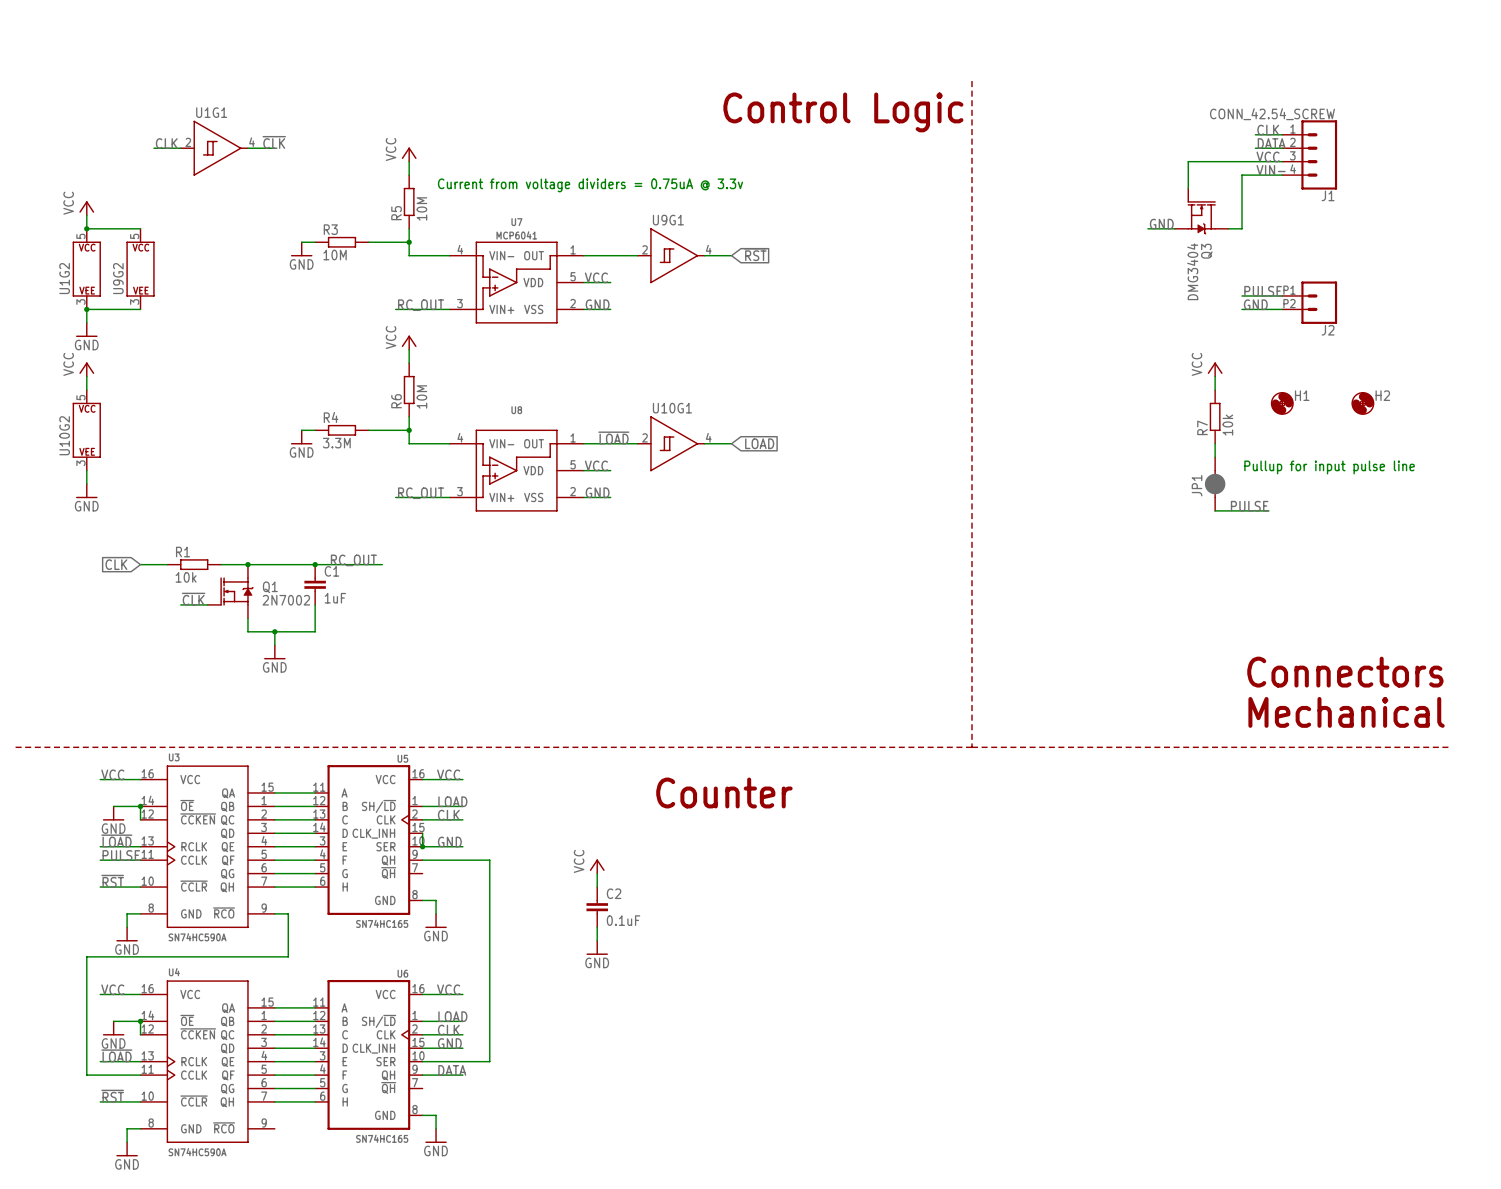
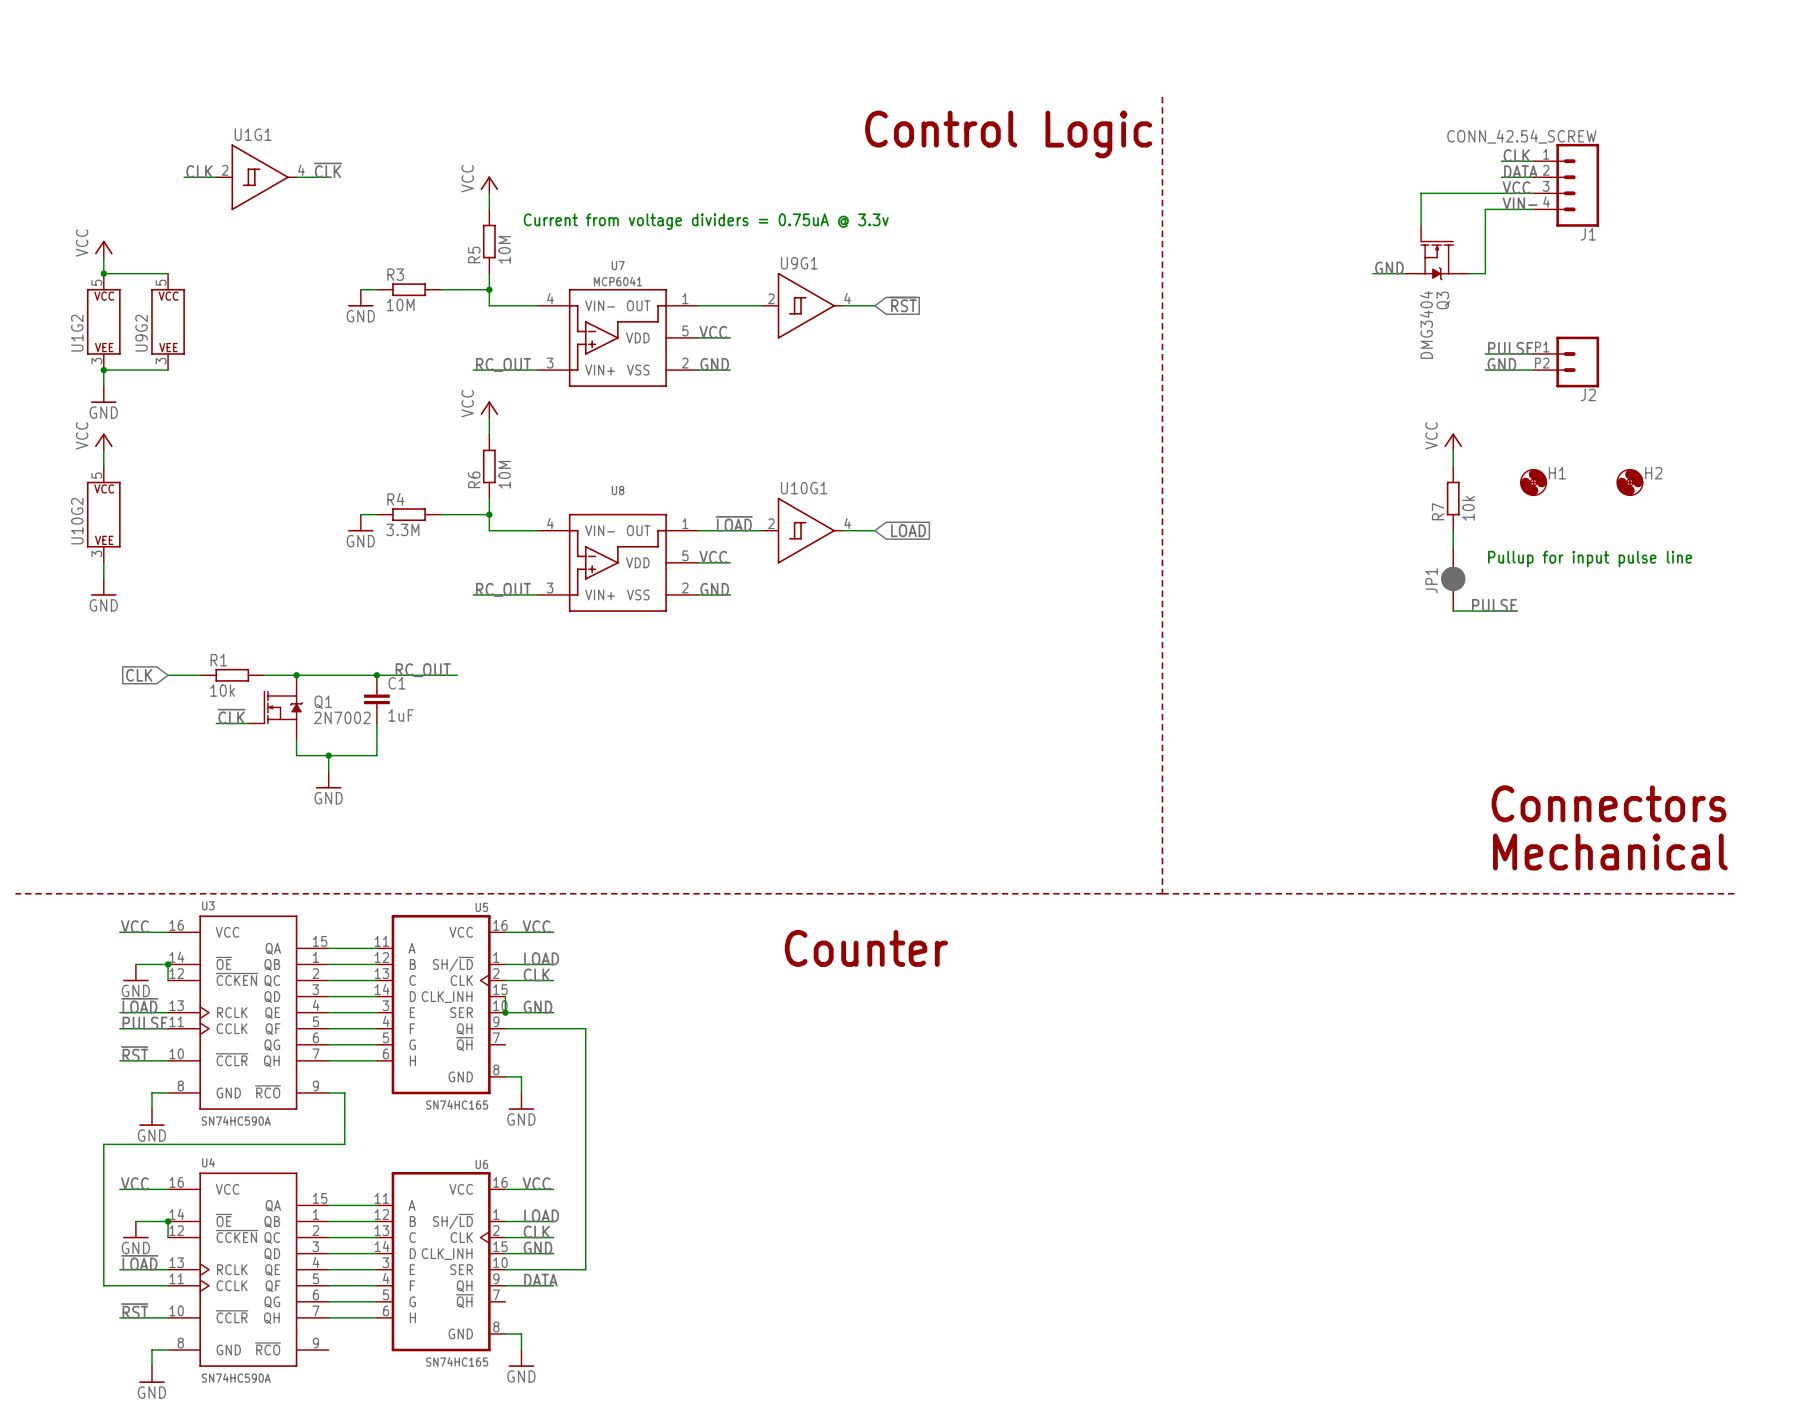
power symbol: VCC (597, 866) -> none
wire: (597, 873) (597, 887) -> none
C2: 0.1uF (597, 907) -> none
wire: (597, 927) (597, 940) -> none
power symbol: GND (597, 947) -> none

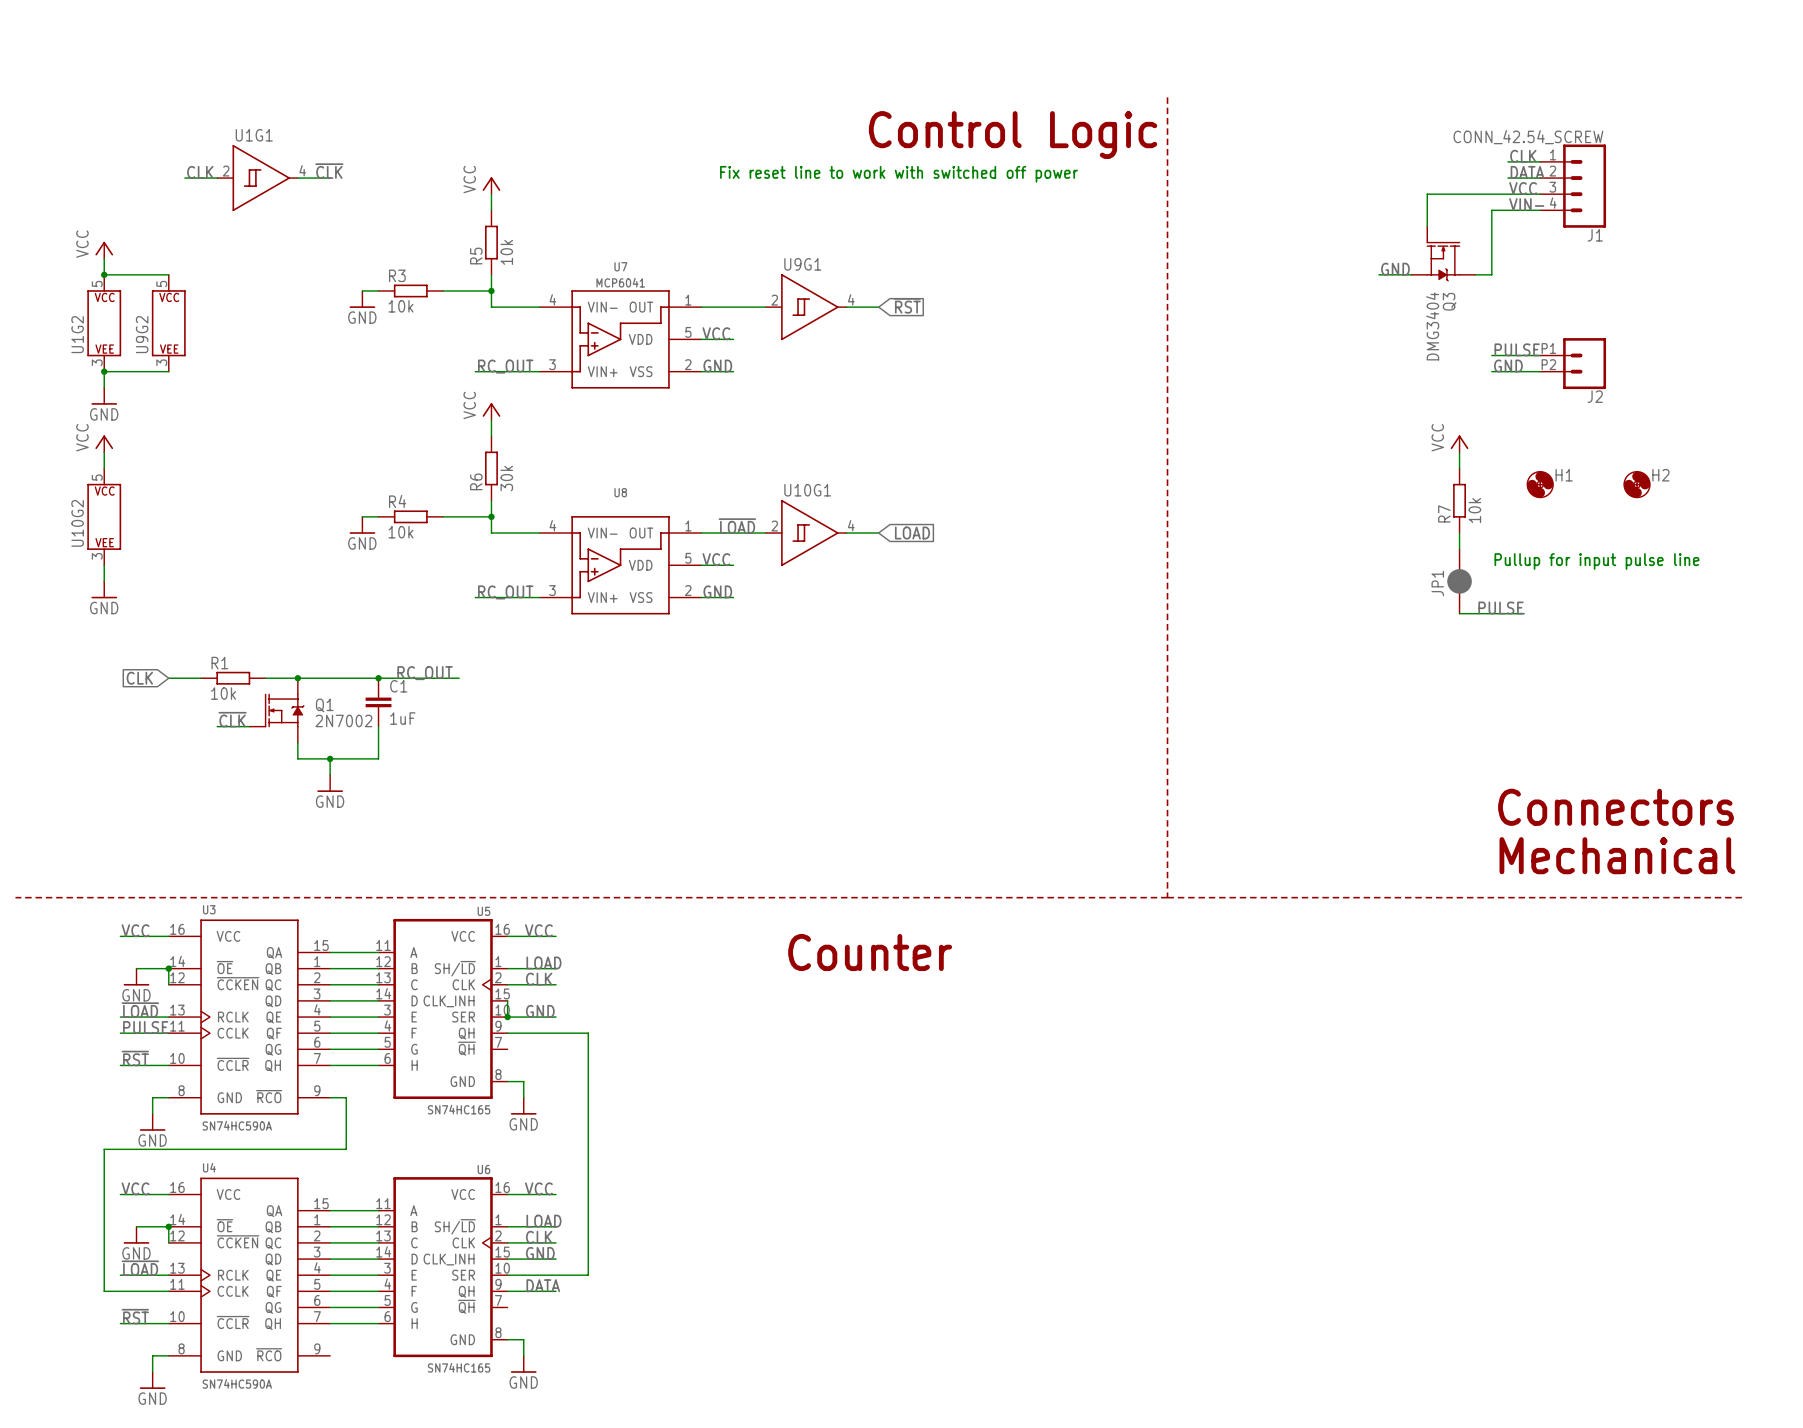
text: none -> Fix reset line to work with switched off power (899, 174)
text: Current from voltage dividers = 0.75uA @ 3.3v (706, 221) -> none
R5 value: 10M (504, 249) -> 10k (506, 252)
R3 value: 10M (400, 304) -> 10k (400, 306)
R6 value: 10M (504, 474) -> 30k (506, 478)
R4 value: 3.3M (402, 529) -> 10k (400, 532)

